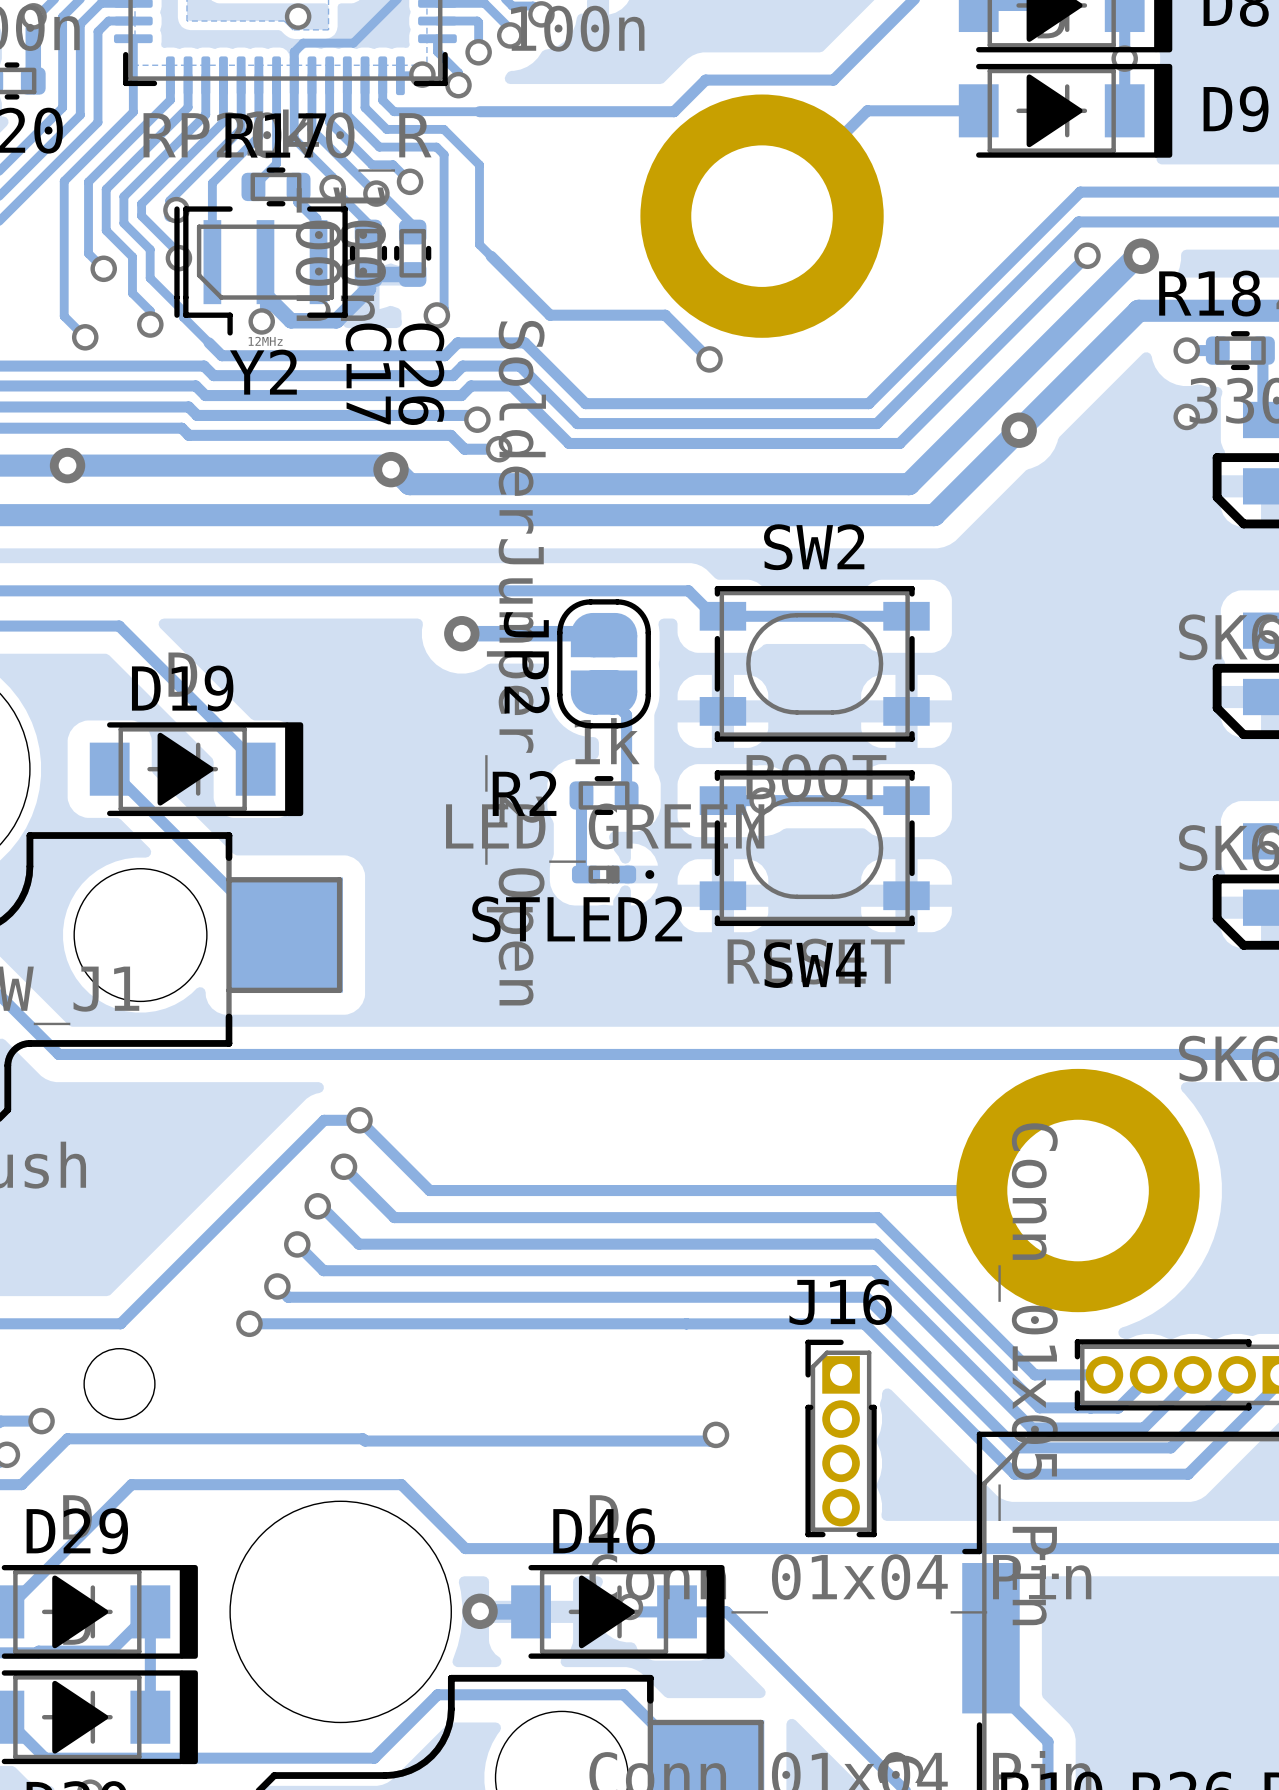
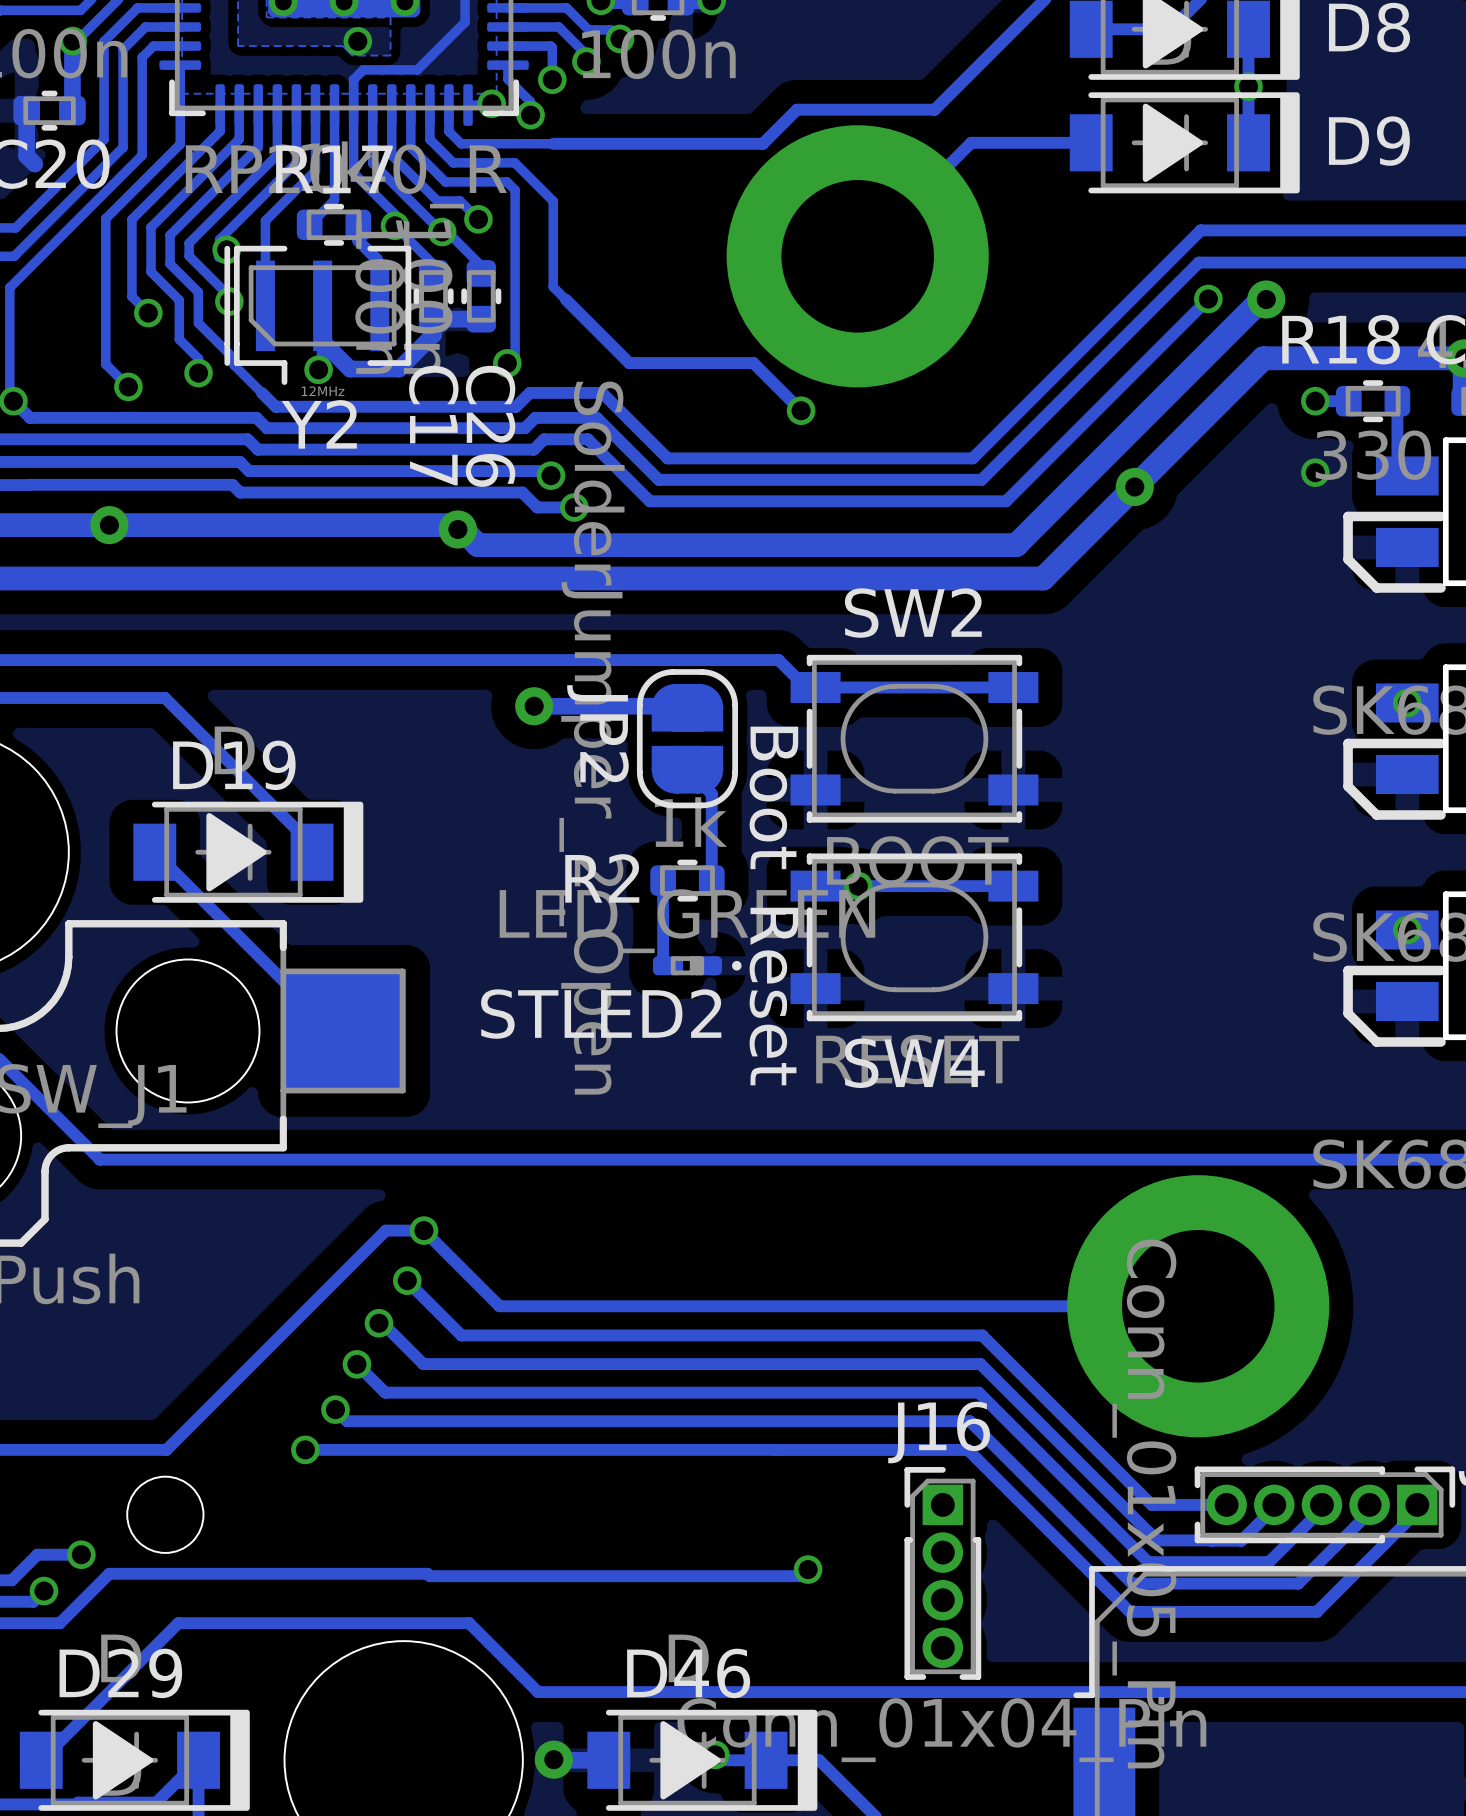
SW2 text: none -> Boot (773, 797)
SW4 text: none -> Reset (773, 996)
STLED2 name position: STLED2 (577, 919) -> STLED2 (601, 1014)

